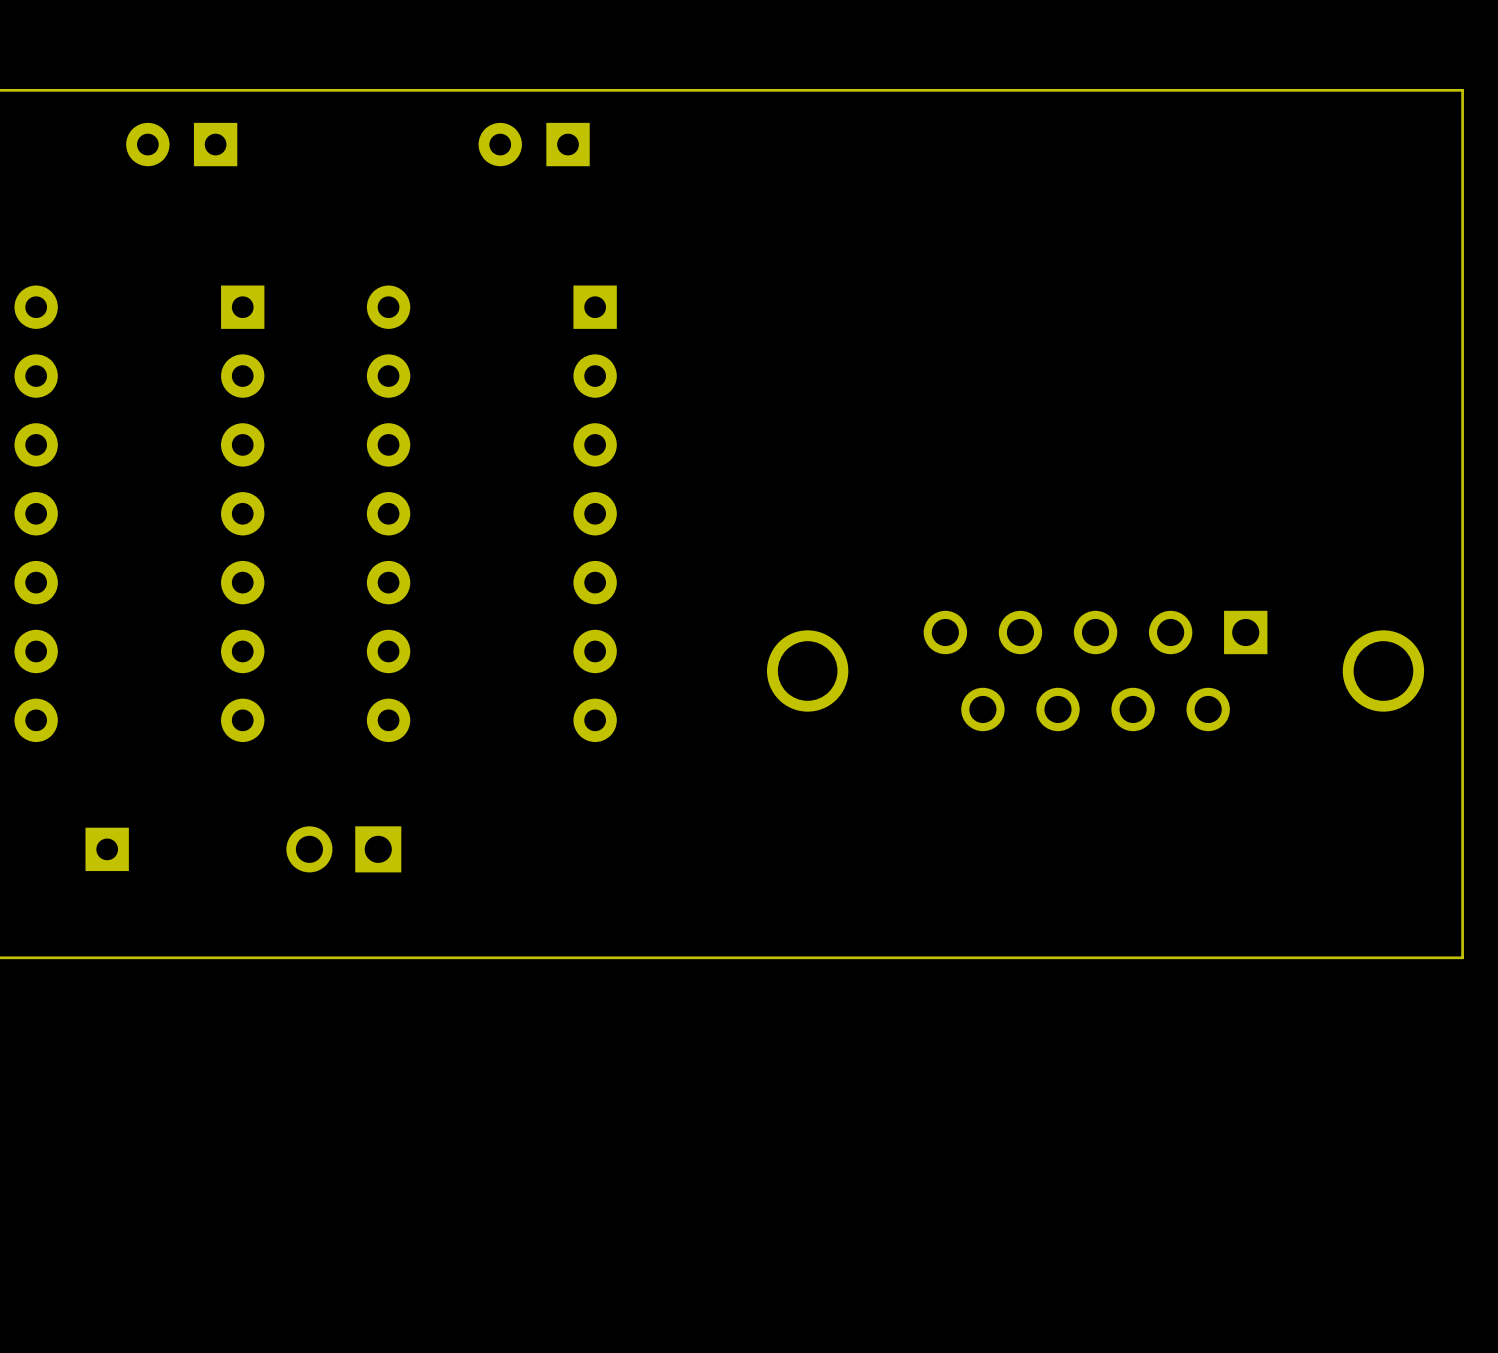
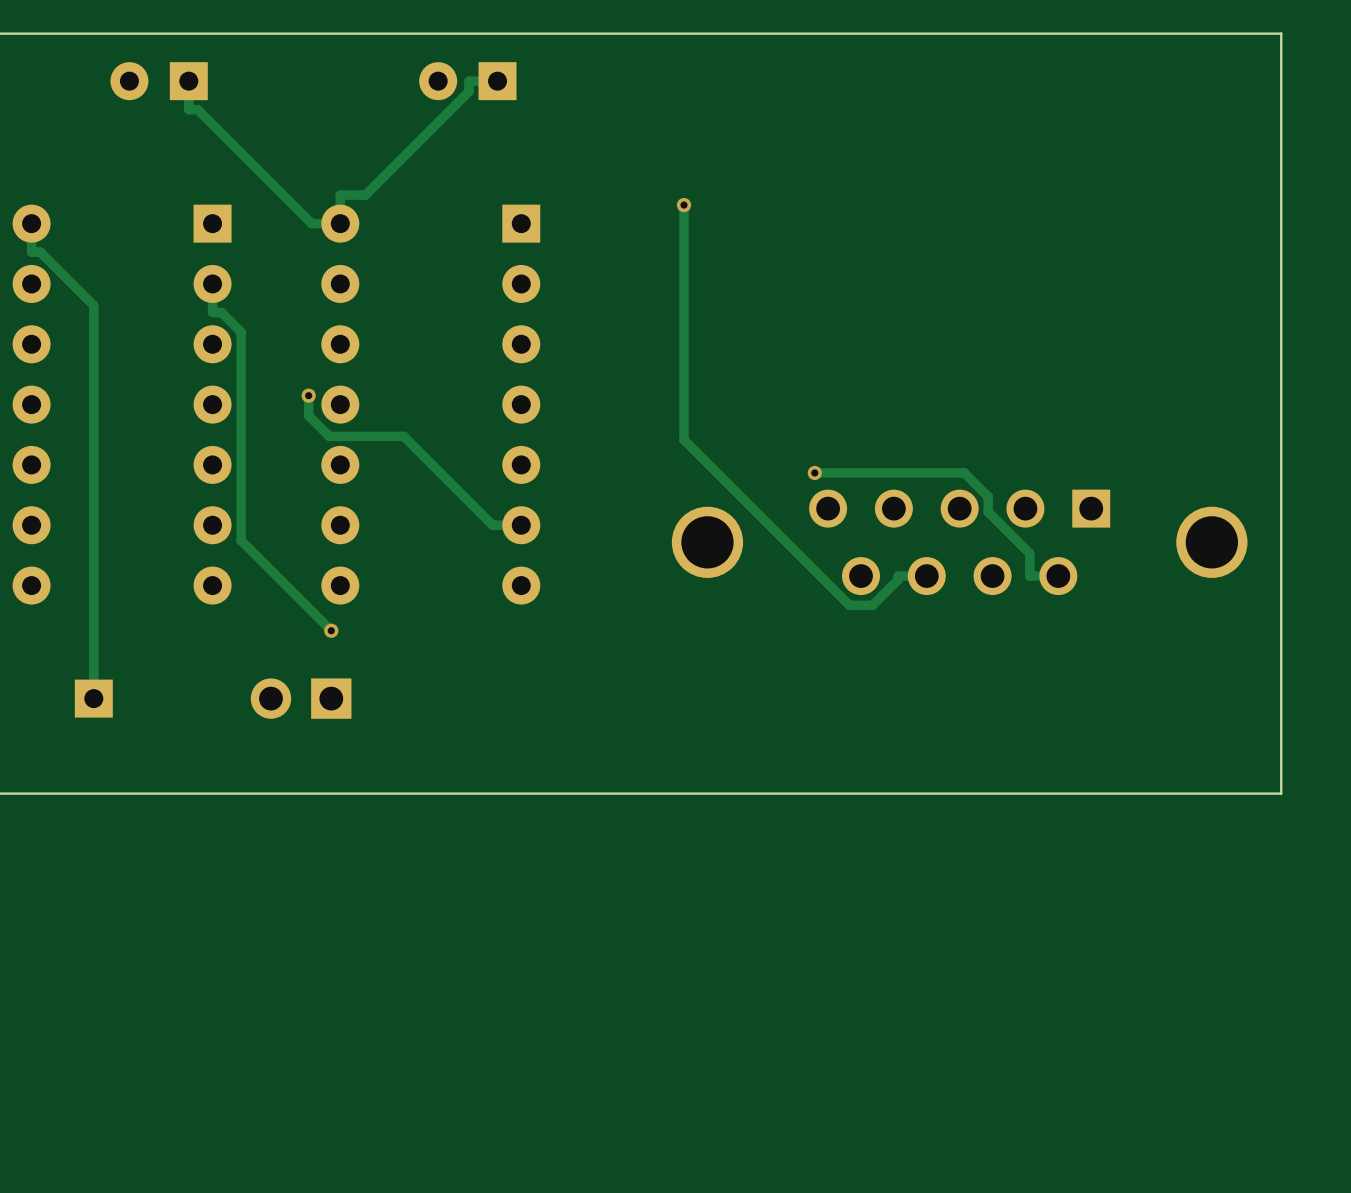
track: none -> (497, 81) (469, 81) (469, 91) (365, 195) (340, 195) (340, 223) (311, 223) (197, 109) (188, 109) (188, 81)
track: none -> (684, 205) (684, 439) (849, 605) (872, 605) (898, 579) (898, 576) (926, 576)
via: none -> (684, 205)
track: none -> (31, 223) (31, 252) (40, 252) (93, 305) (93, 698)
track: none -> (212, 283) (212, 312) (221, 312) (241, 332) (241, 540) (331, 630)
track: none -> (308, 395) (308, 415) (329, 436) (403, 436) (492, 525) (521, 525)
via: none -> (308, 395)
track: none -> (814, 472) (964, 472) (988, 496) (988, 511) (1029, 553) (1029, 576) (1058, 576)
via: none -> (814, 472)
via: none -> (331, 630)

